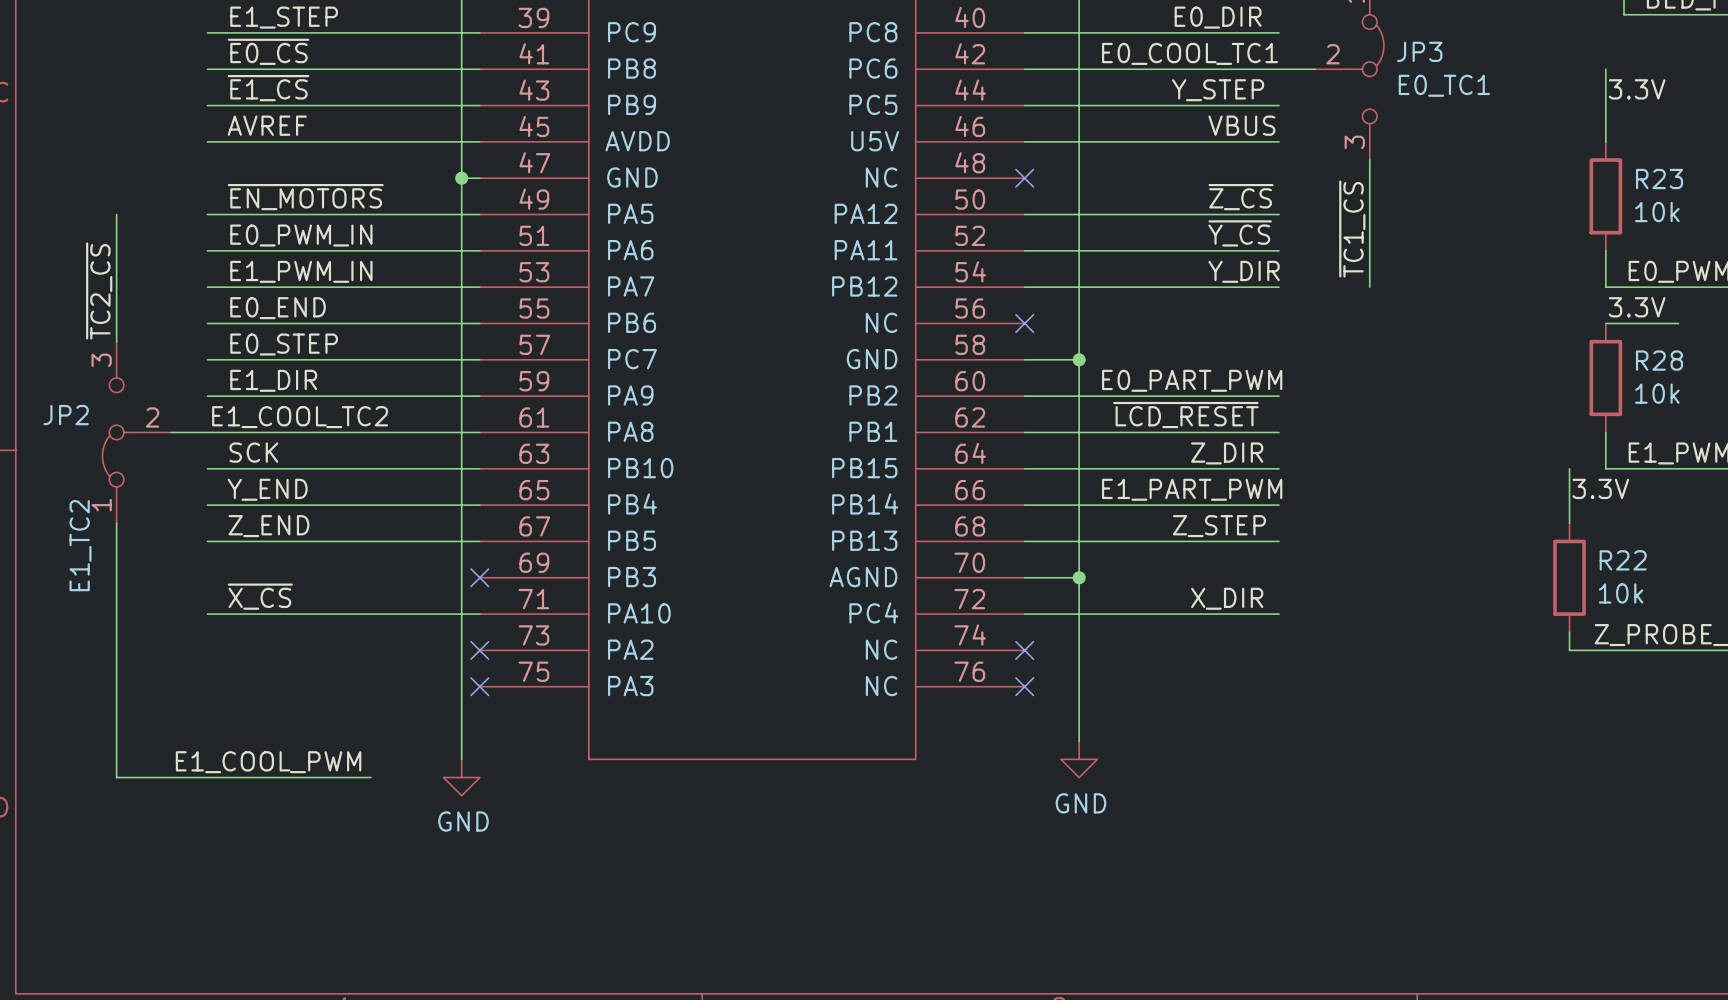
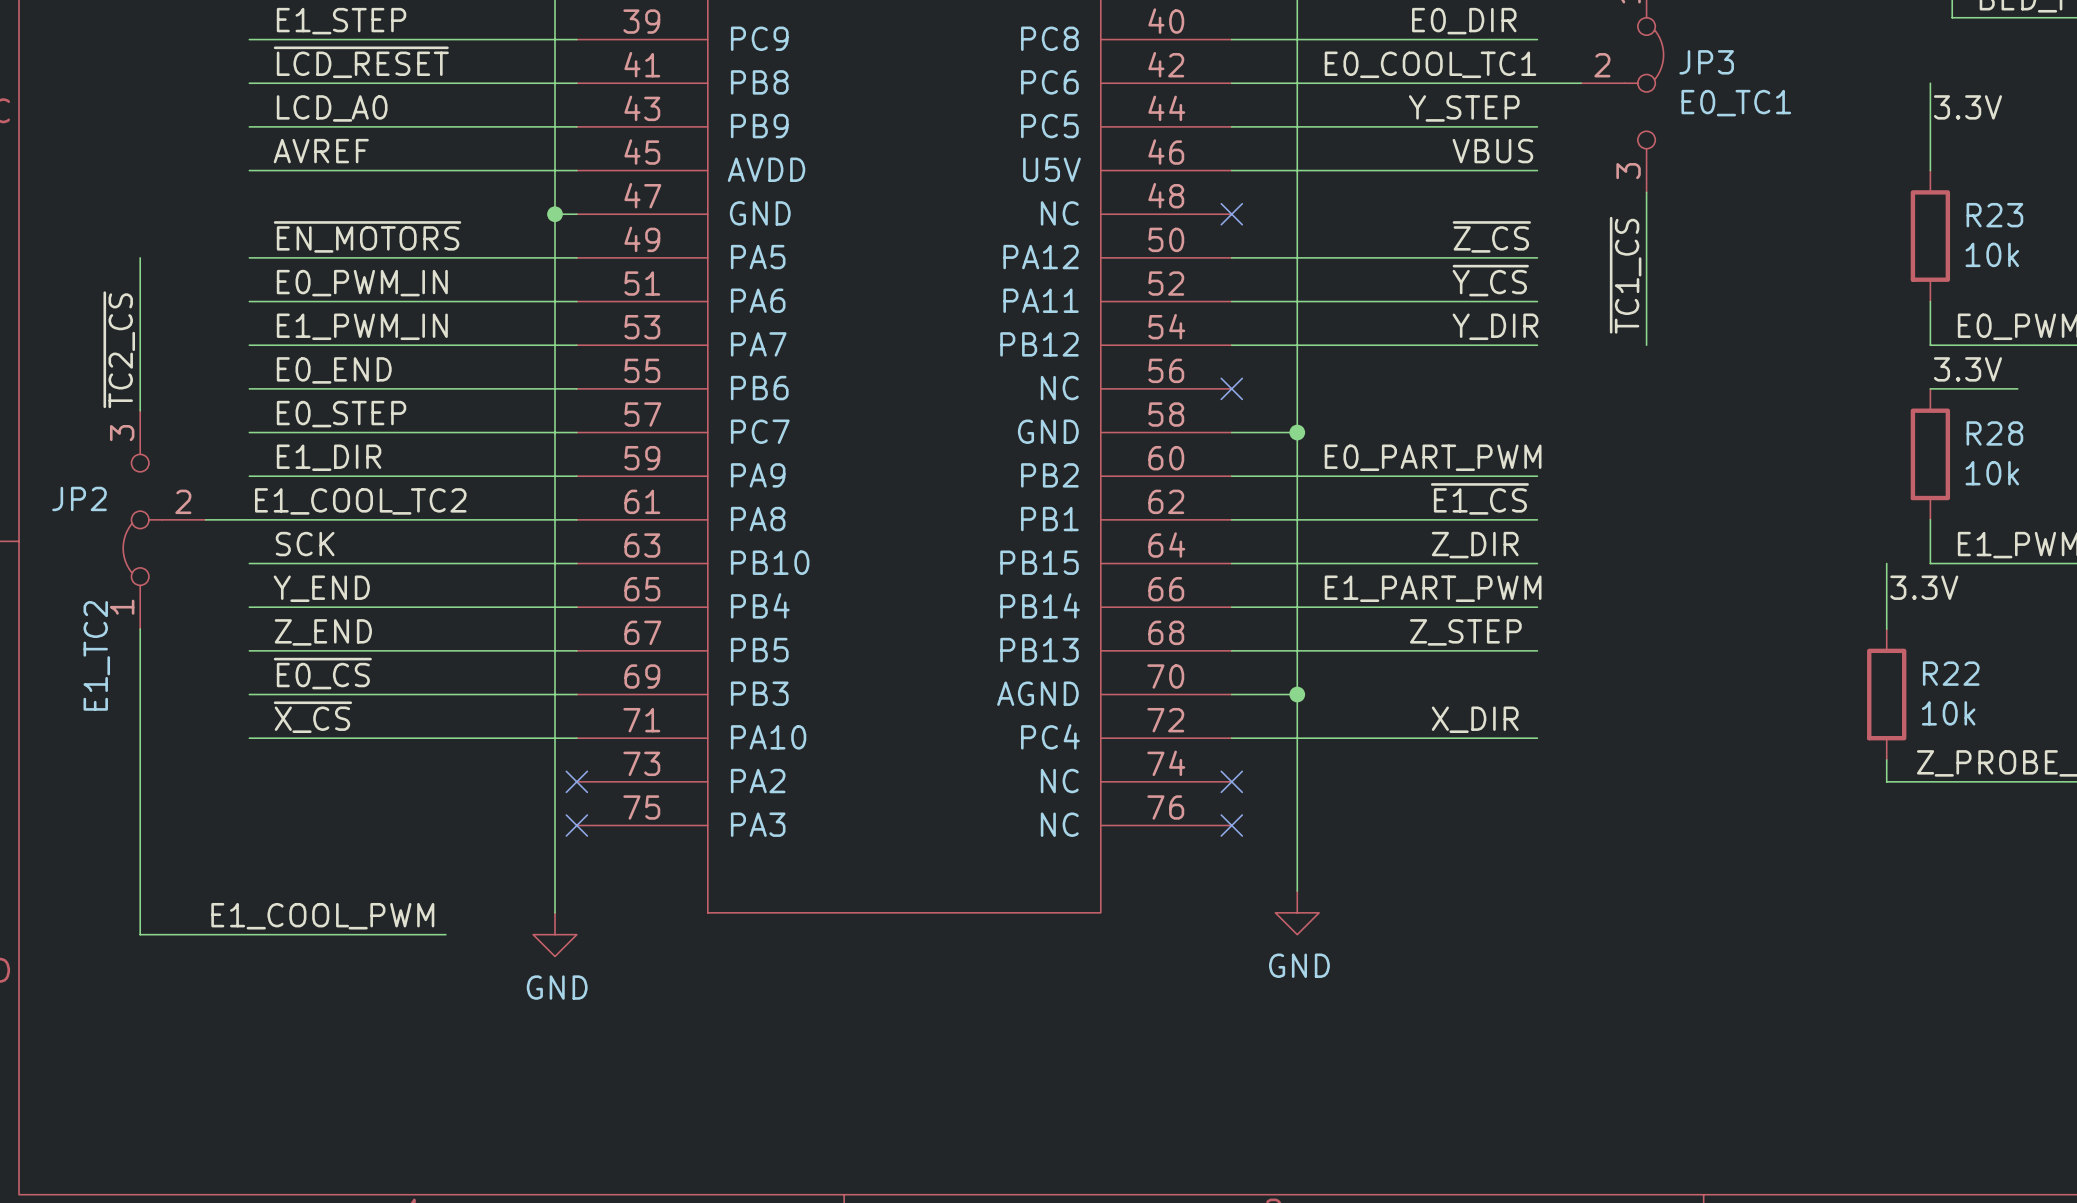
label: ~{E0_CS} (268, 51) -> ~{LCD_RESET} (361, 62)
label: ~{E1_CS} (268, 88) -> LCD_A0 (332, 108)
label: ~{LCD_RESET} (1185, 415) -> none
label: none -> ~{E1_CS} (1479, 498)
label: none -> ~{E0_CS} (322, 673)
wire: none -> (249, 694) (576, 694)
no-connect mark: (479, 577) -> none

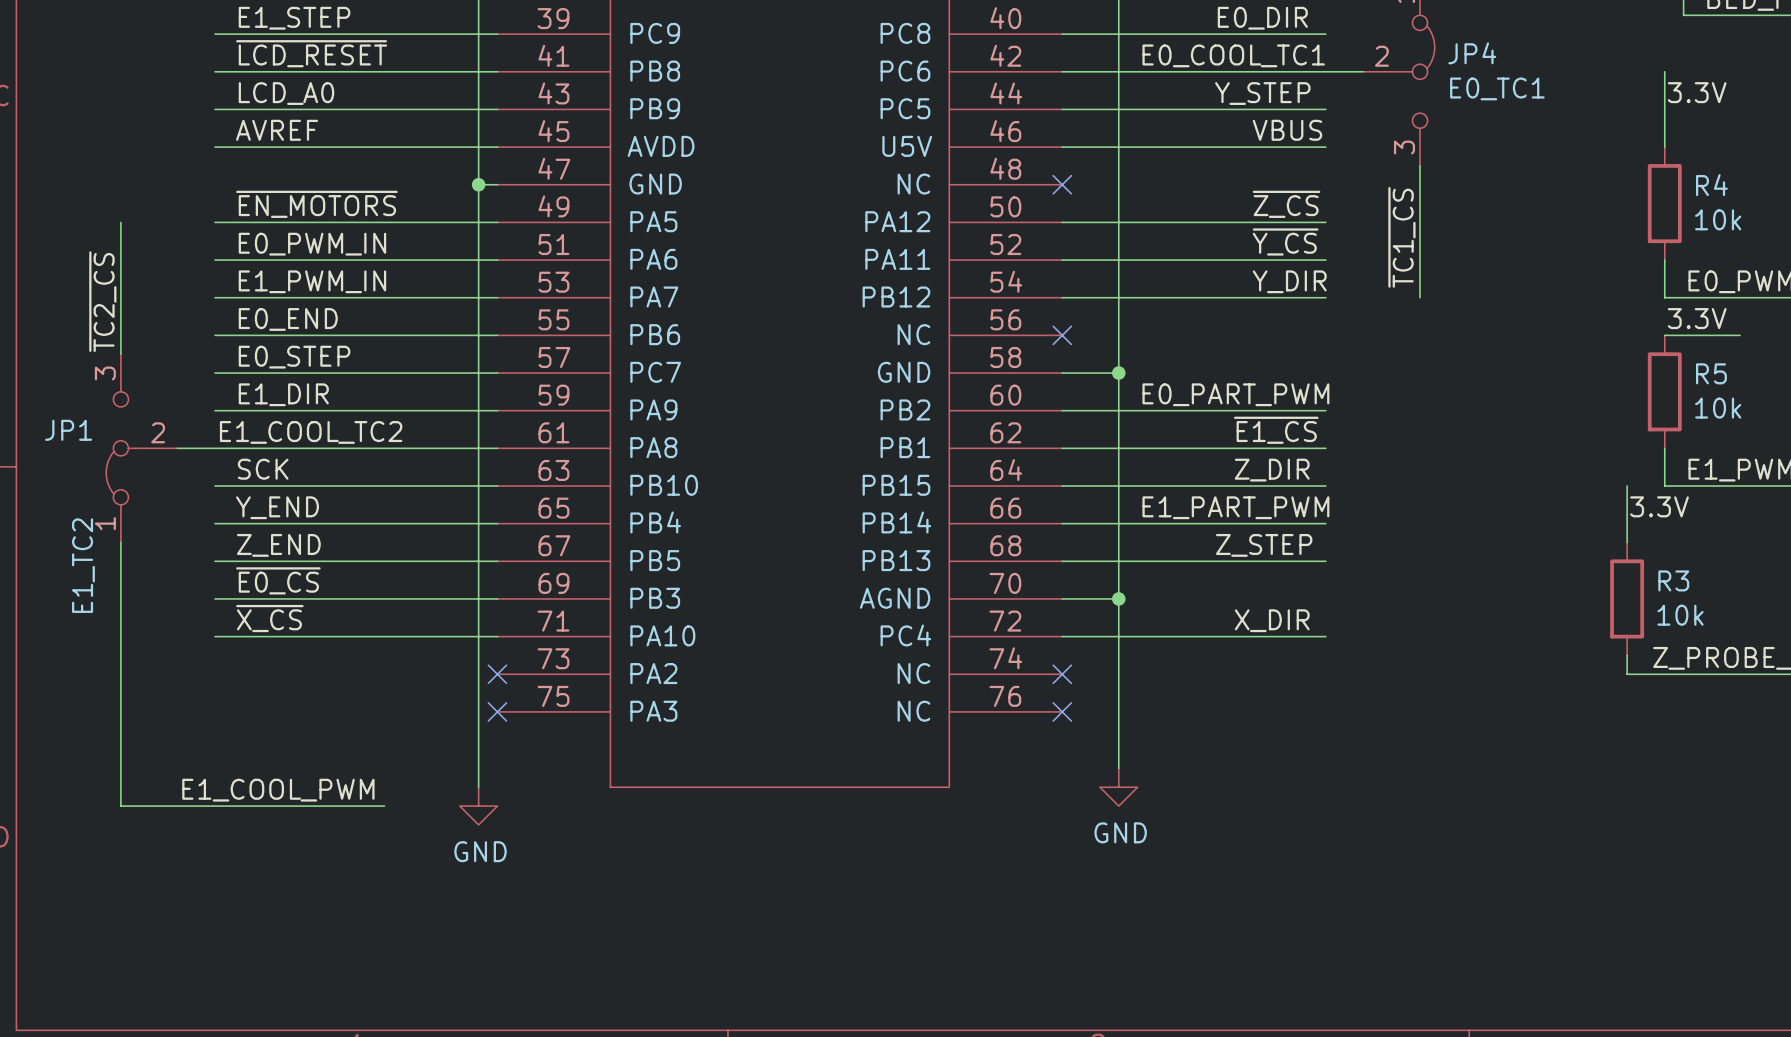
JP3 name: JP3 (1706, 62) -> JP4 (1472, 53)
R23 name: R23 (1994, 215) -> R4 (1711, 185)
R28 name: R28 (1994, 433) -> R5 (1711, 373)
JP2 name: JP2 (79, 498) -> JP1 (68, 430)
R22 name: R22 (1951, 673) -> R3 (1673, 580)

